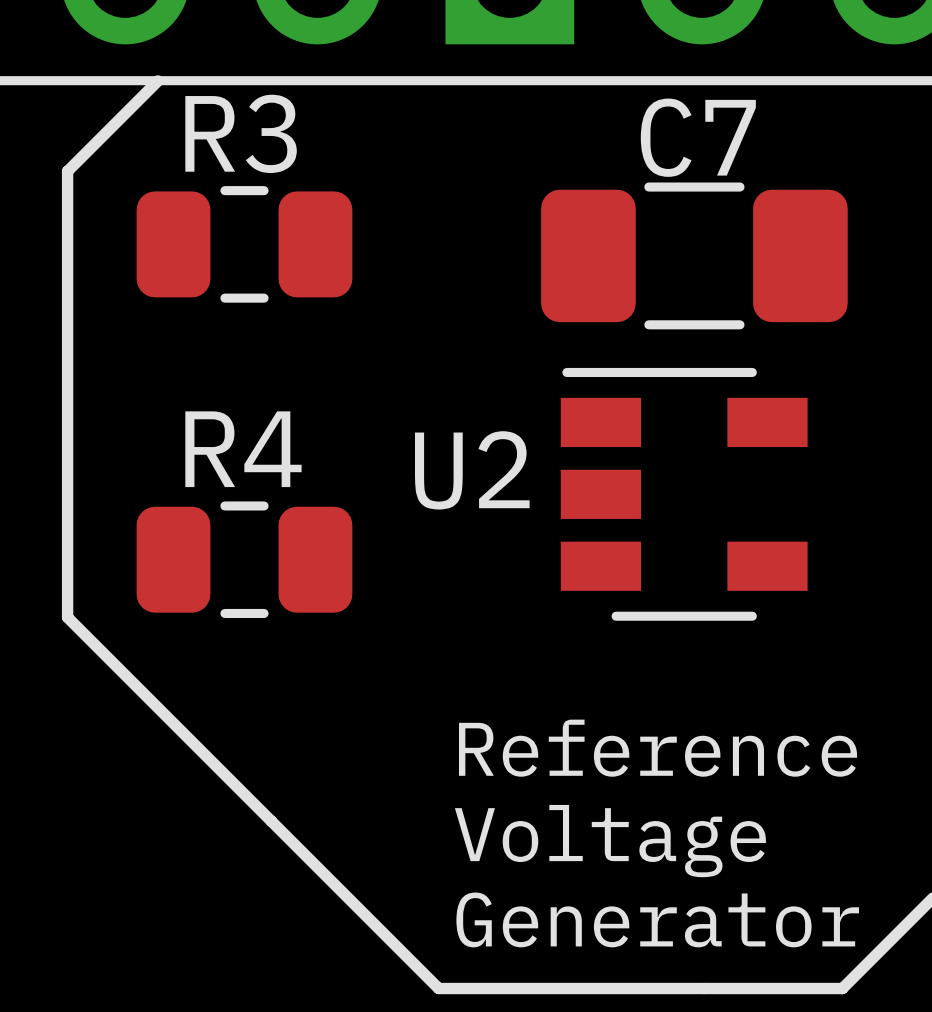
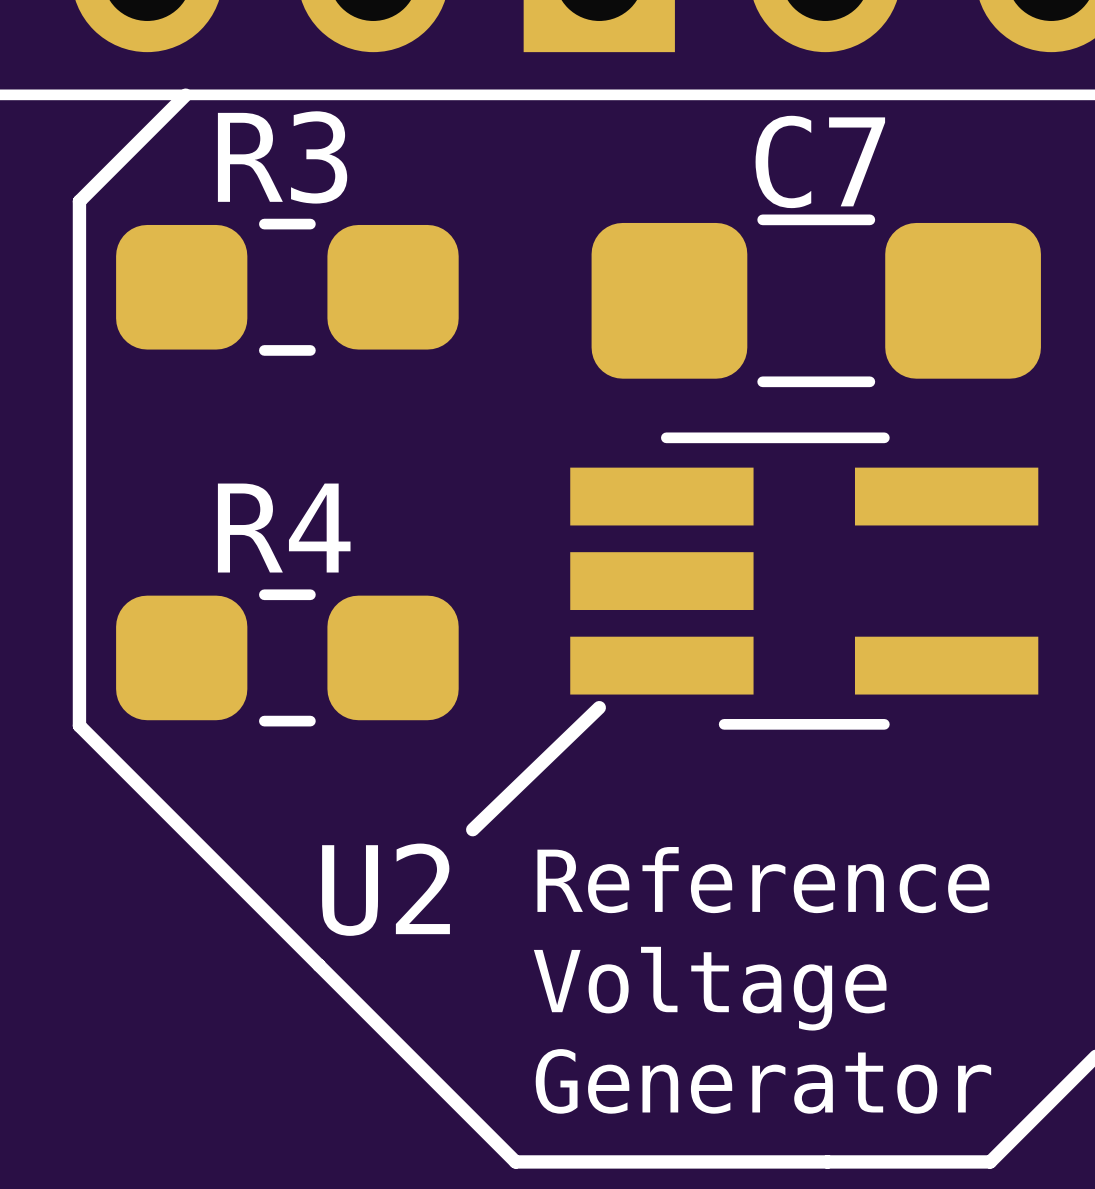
C7 footprint: [541, 182, 848, 330] -> [591, 214, 1041, 388]
R3 footprint: [136, 186, 353, 303] -> [116, 218, 459, 356]
U2 footprint: [560, 367, 808, 621] -> [570, 432, 1039, 730]
U2 name position: U2 (472, 470) -> U2 (386, 889)
R4 footprint: [136, 501, 353, 619] -> [116, 589, 459, 727]
line: none -> (599, 707) (472, 829)

